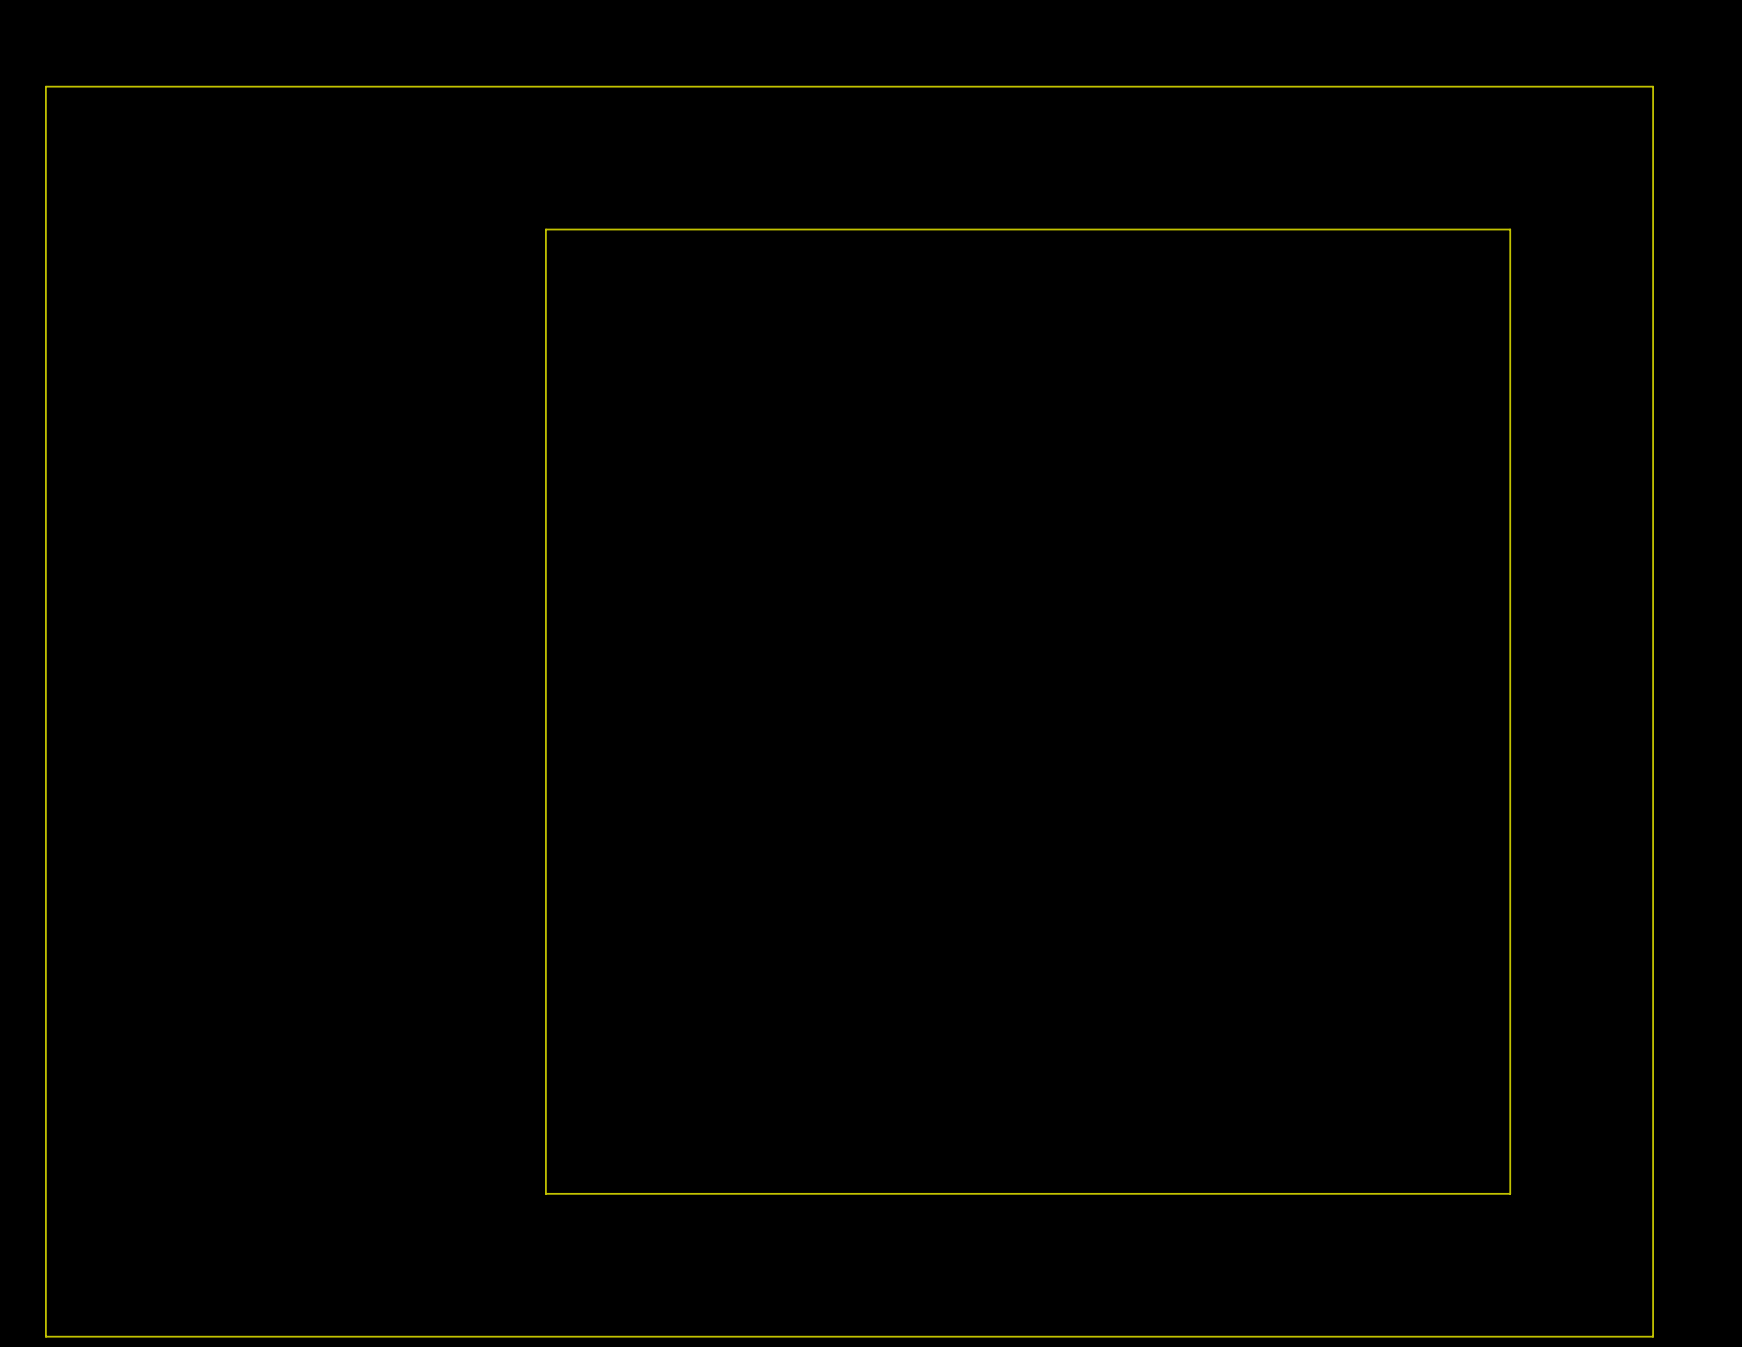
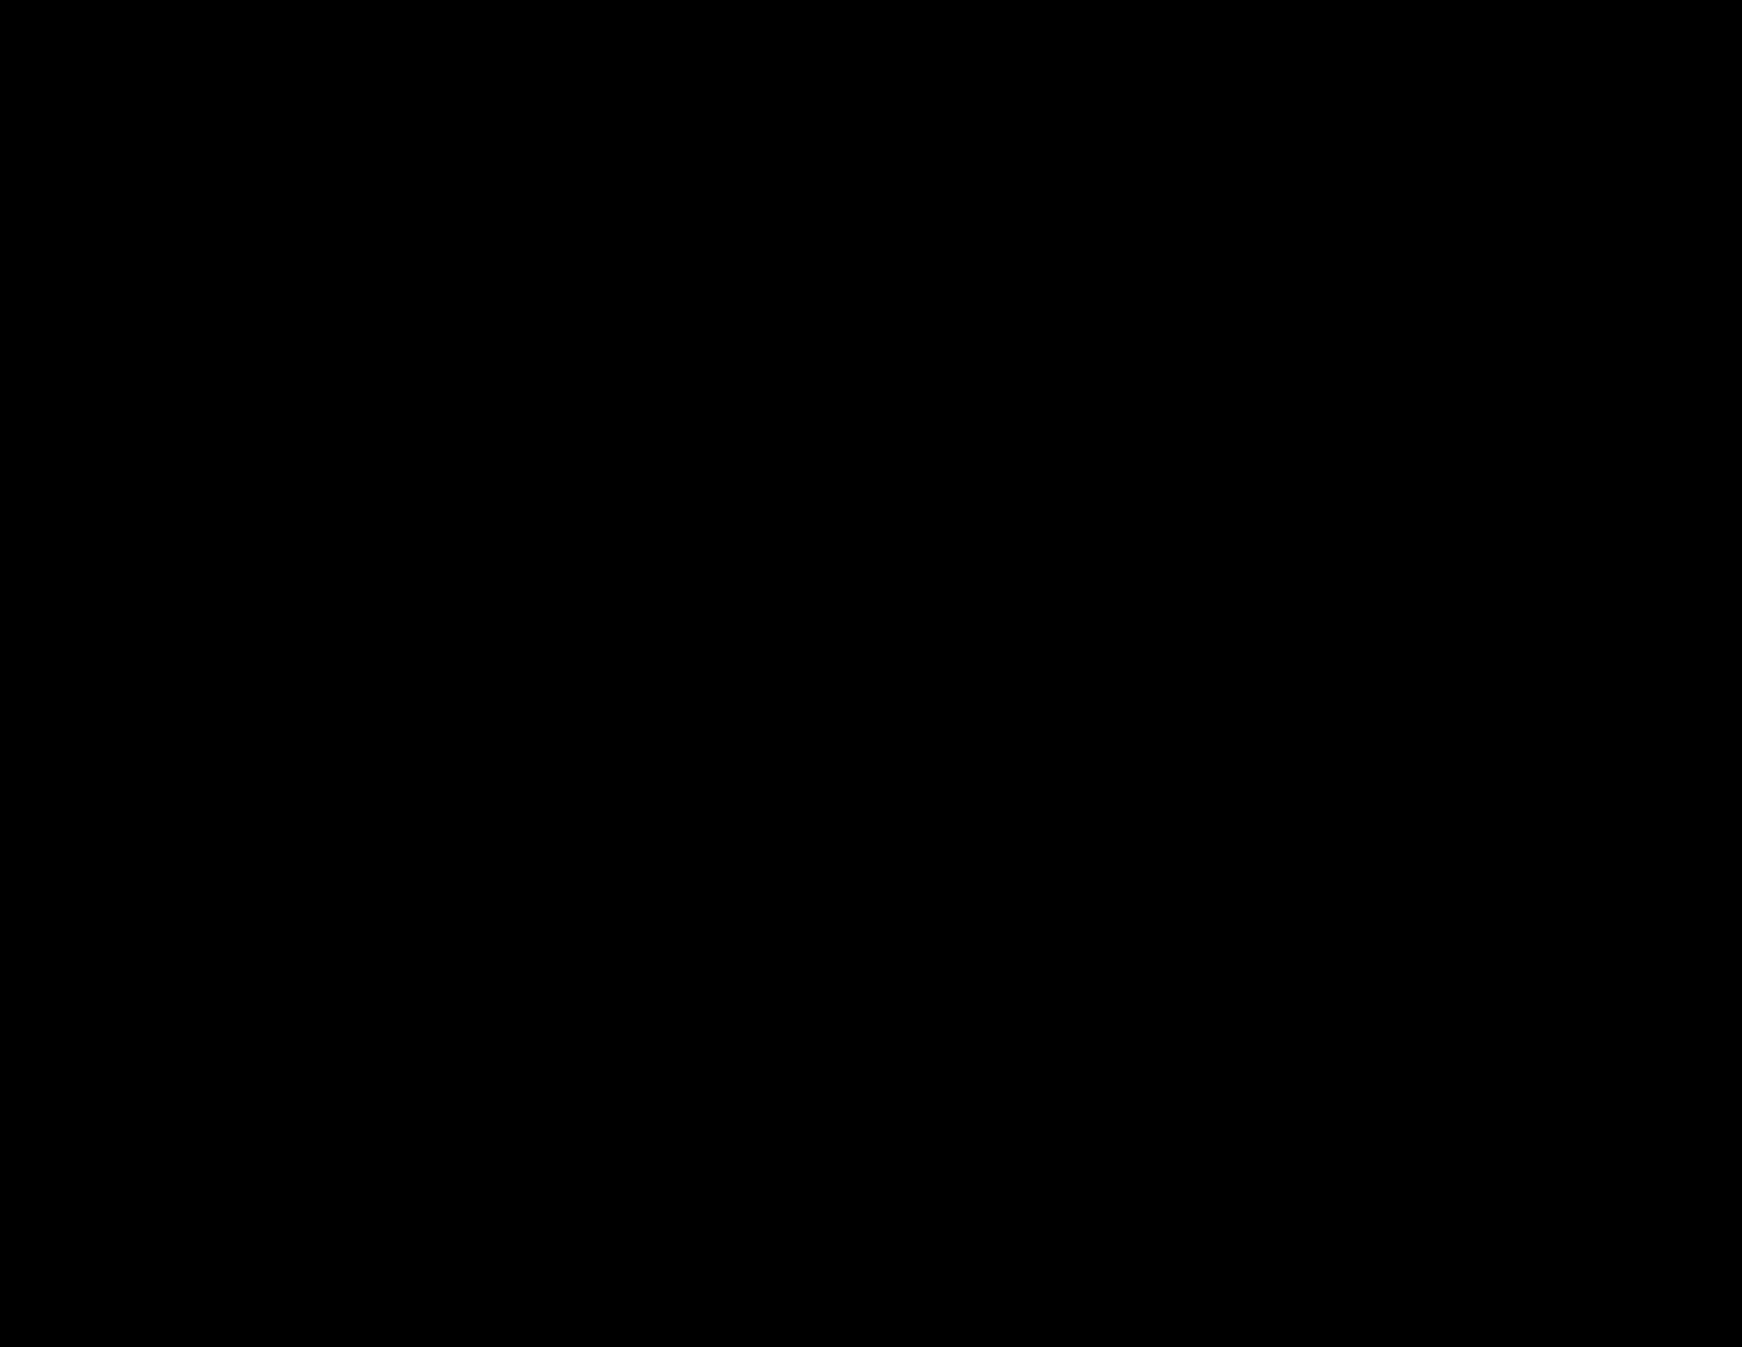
board edge: (45, 86) (45, 1336) (1653, 1336) (1653, 86) (45, 86) -> none
board edge: (545, 229) (1510, 229) (1510, 1193) (545, 1193) (545, 229) -> none

